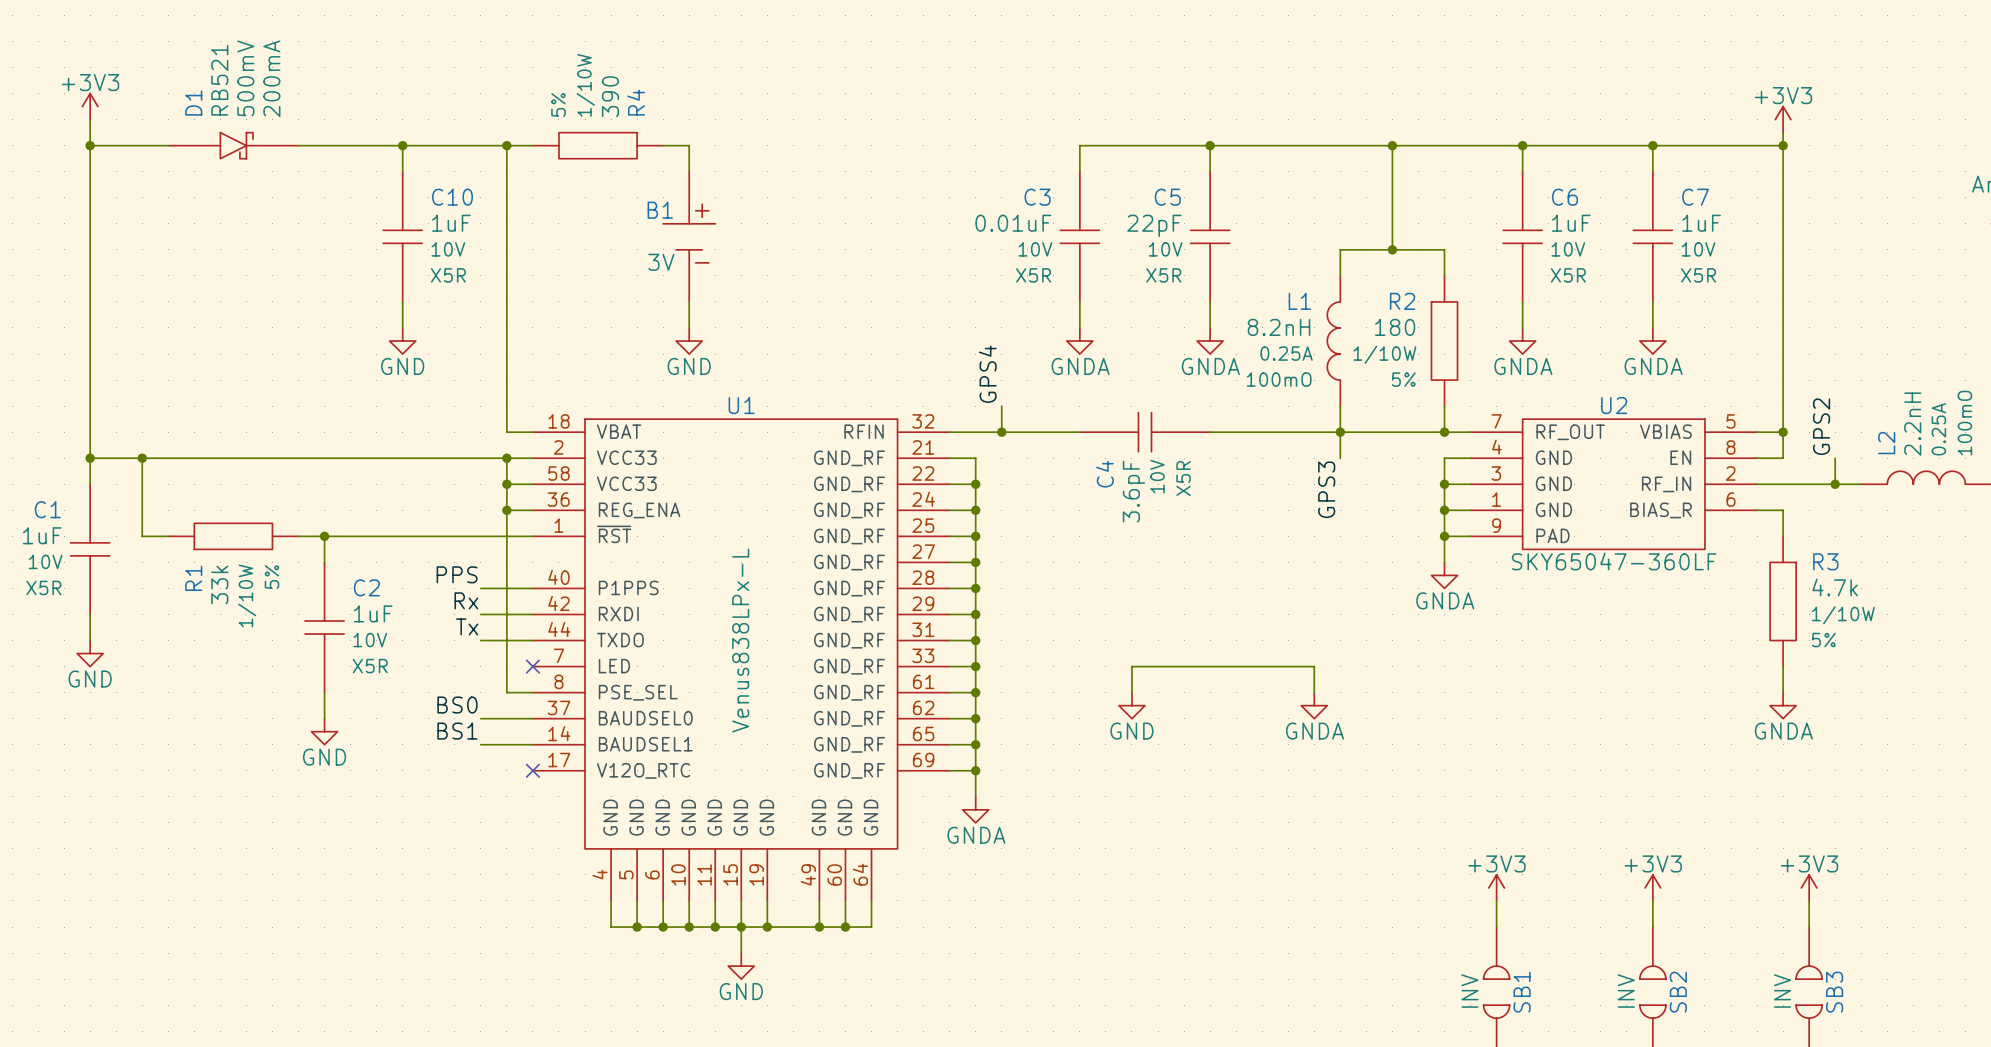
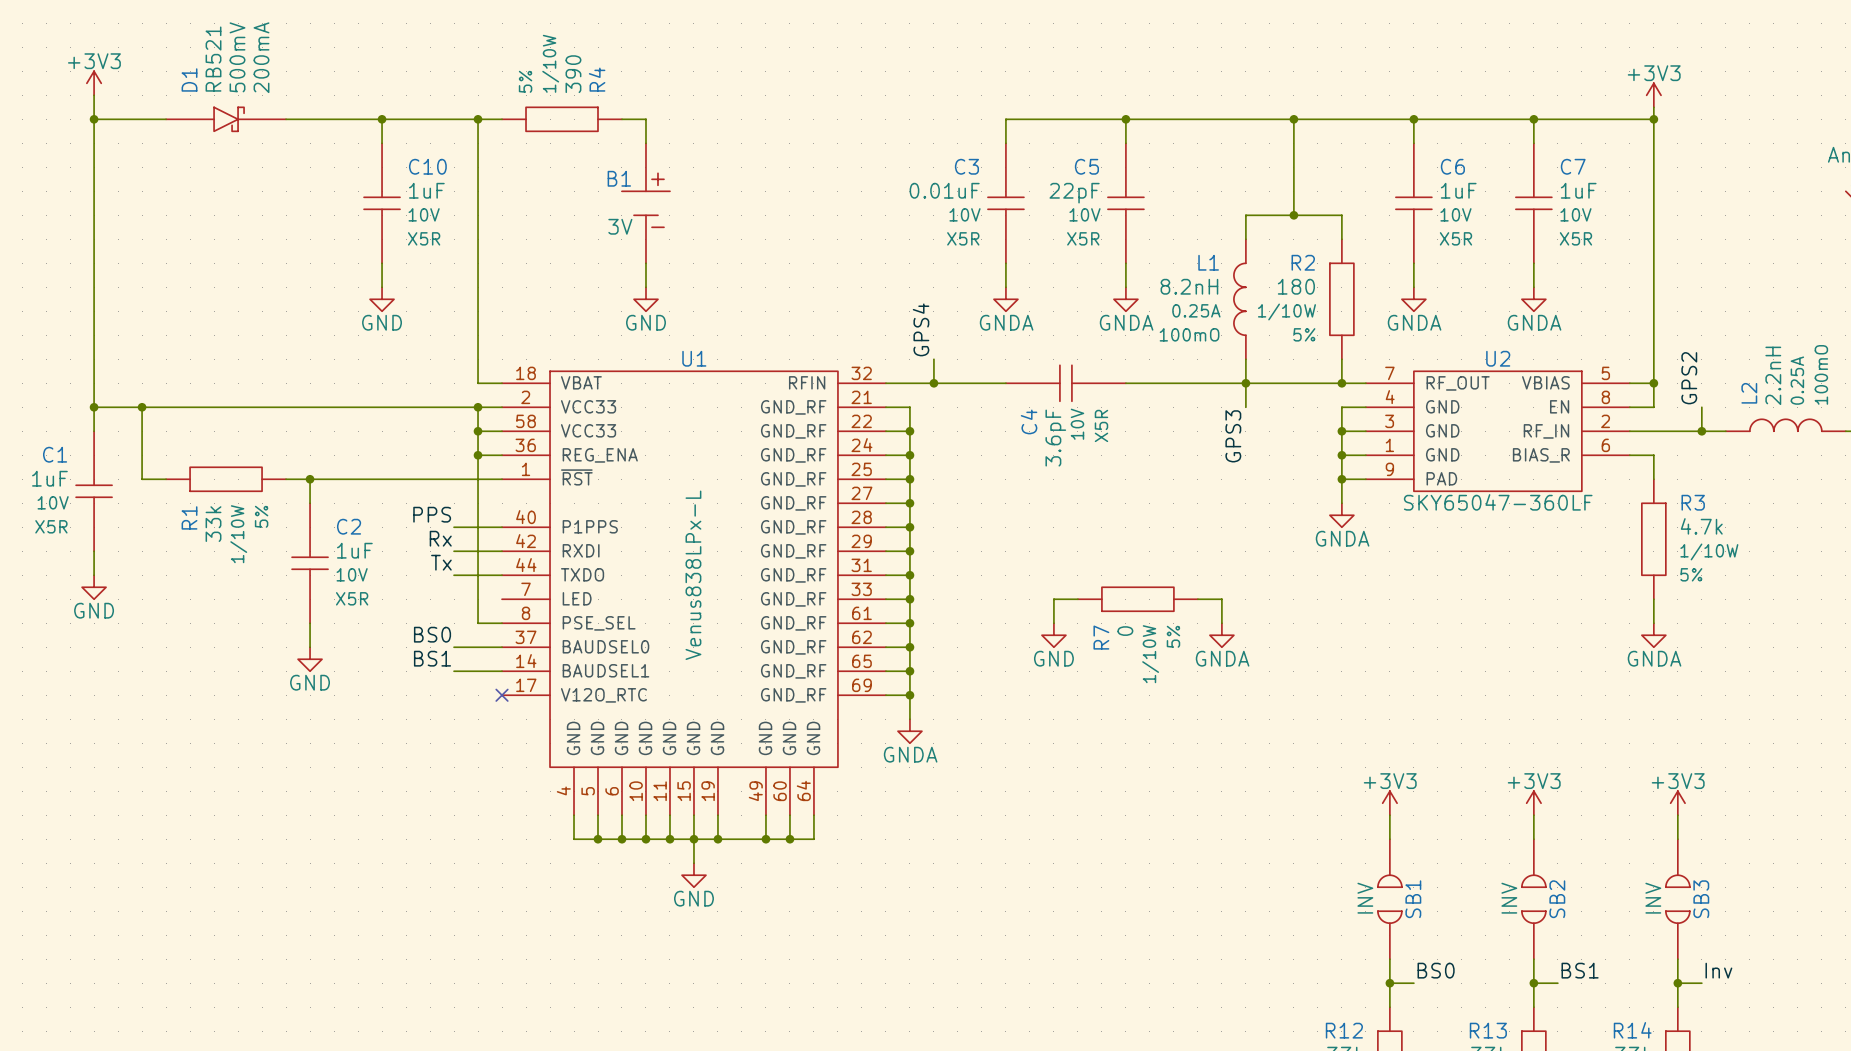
no-connect mark: (532, 666) -> none
wire: (1158, 666) (1288, 666) -> none
R7: none -> 0 (1137, 599)

